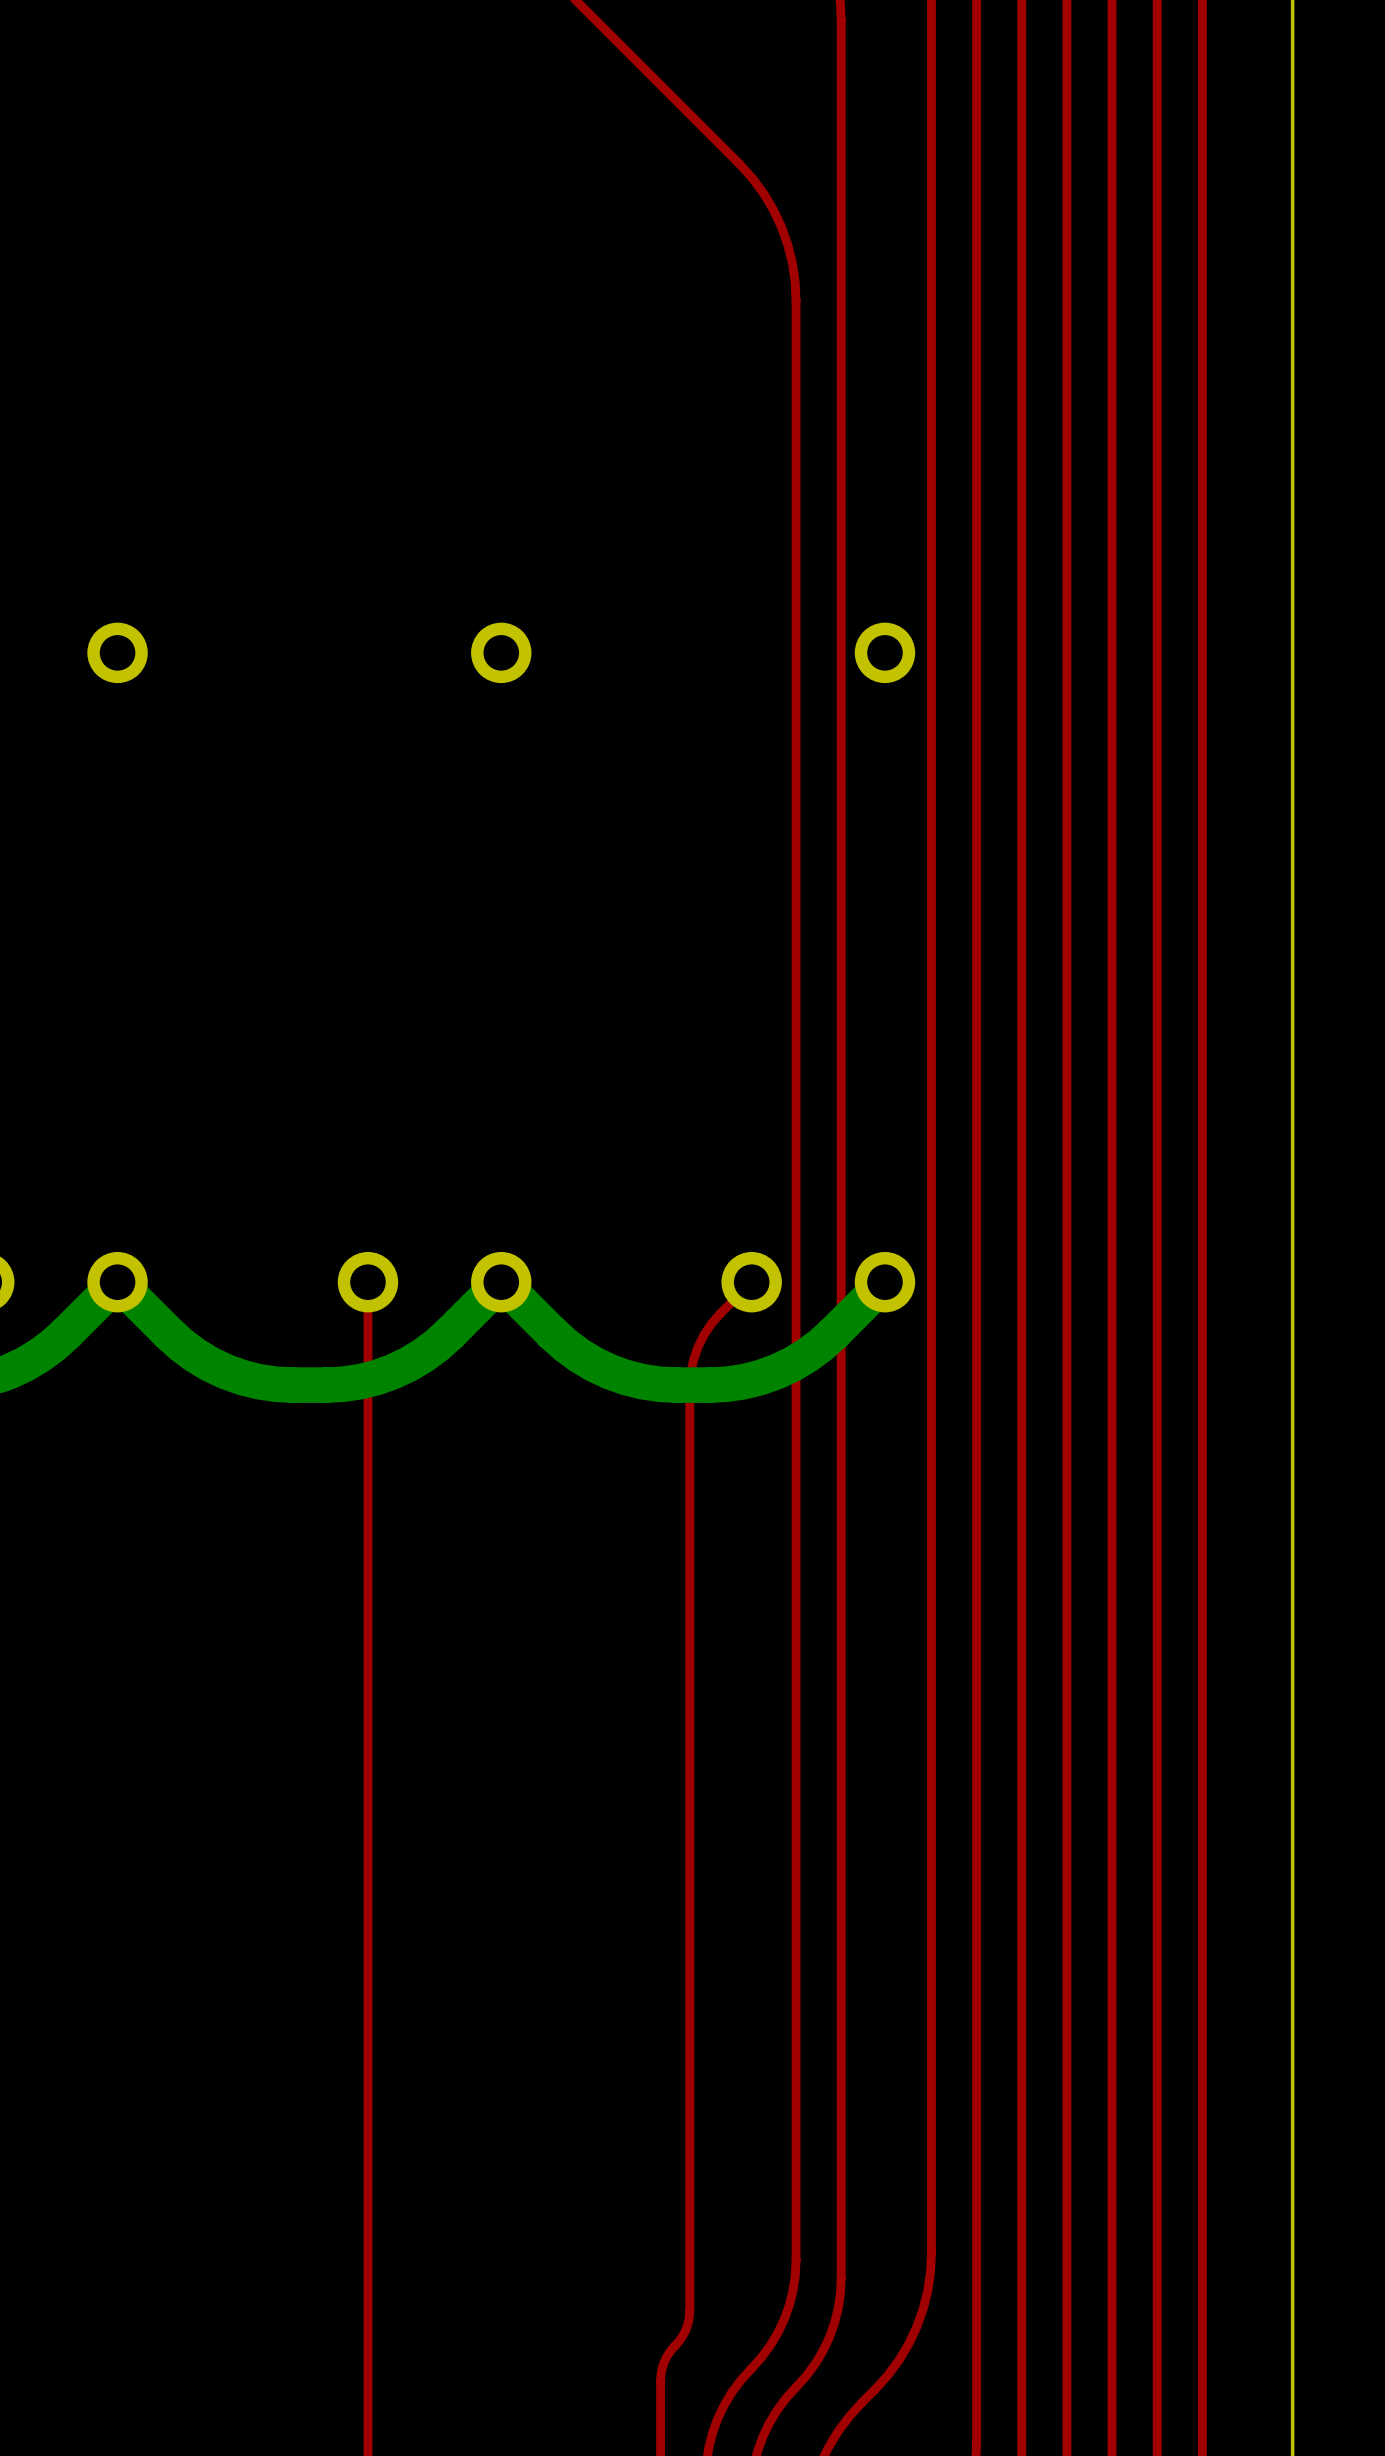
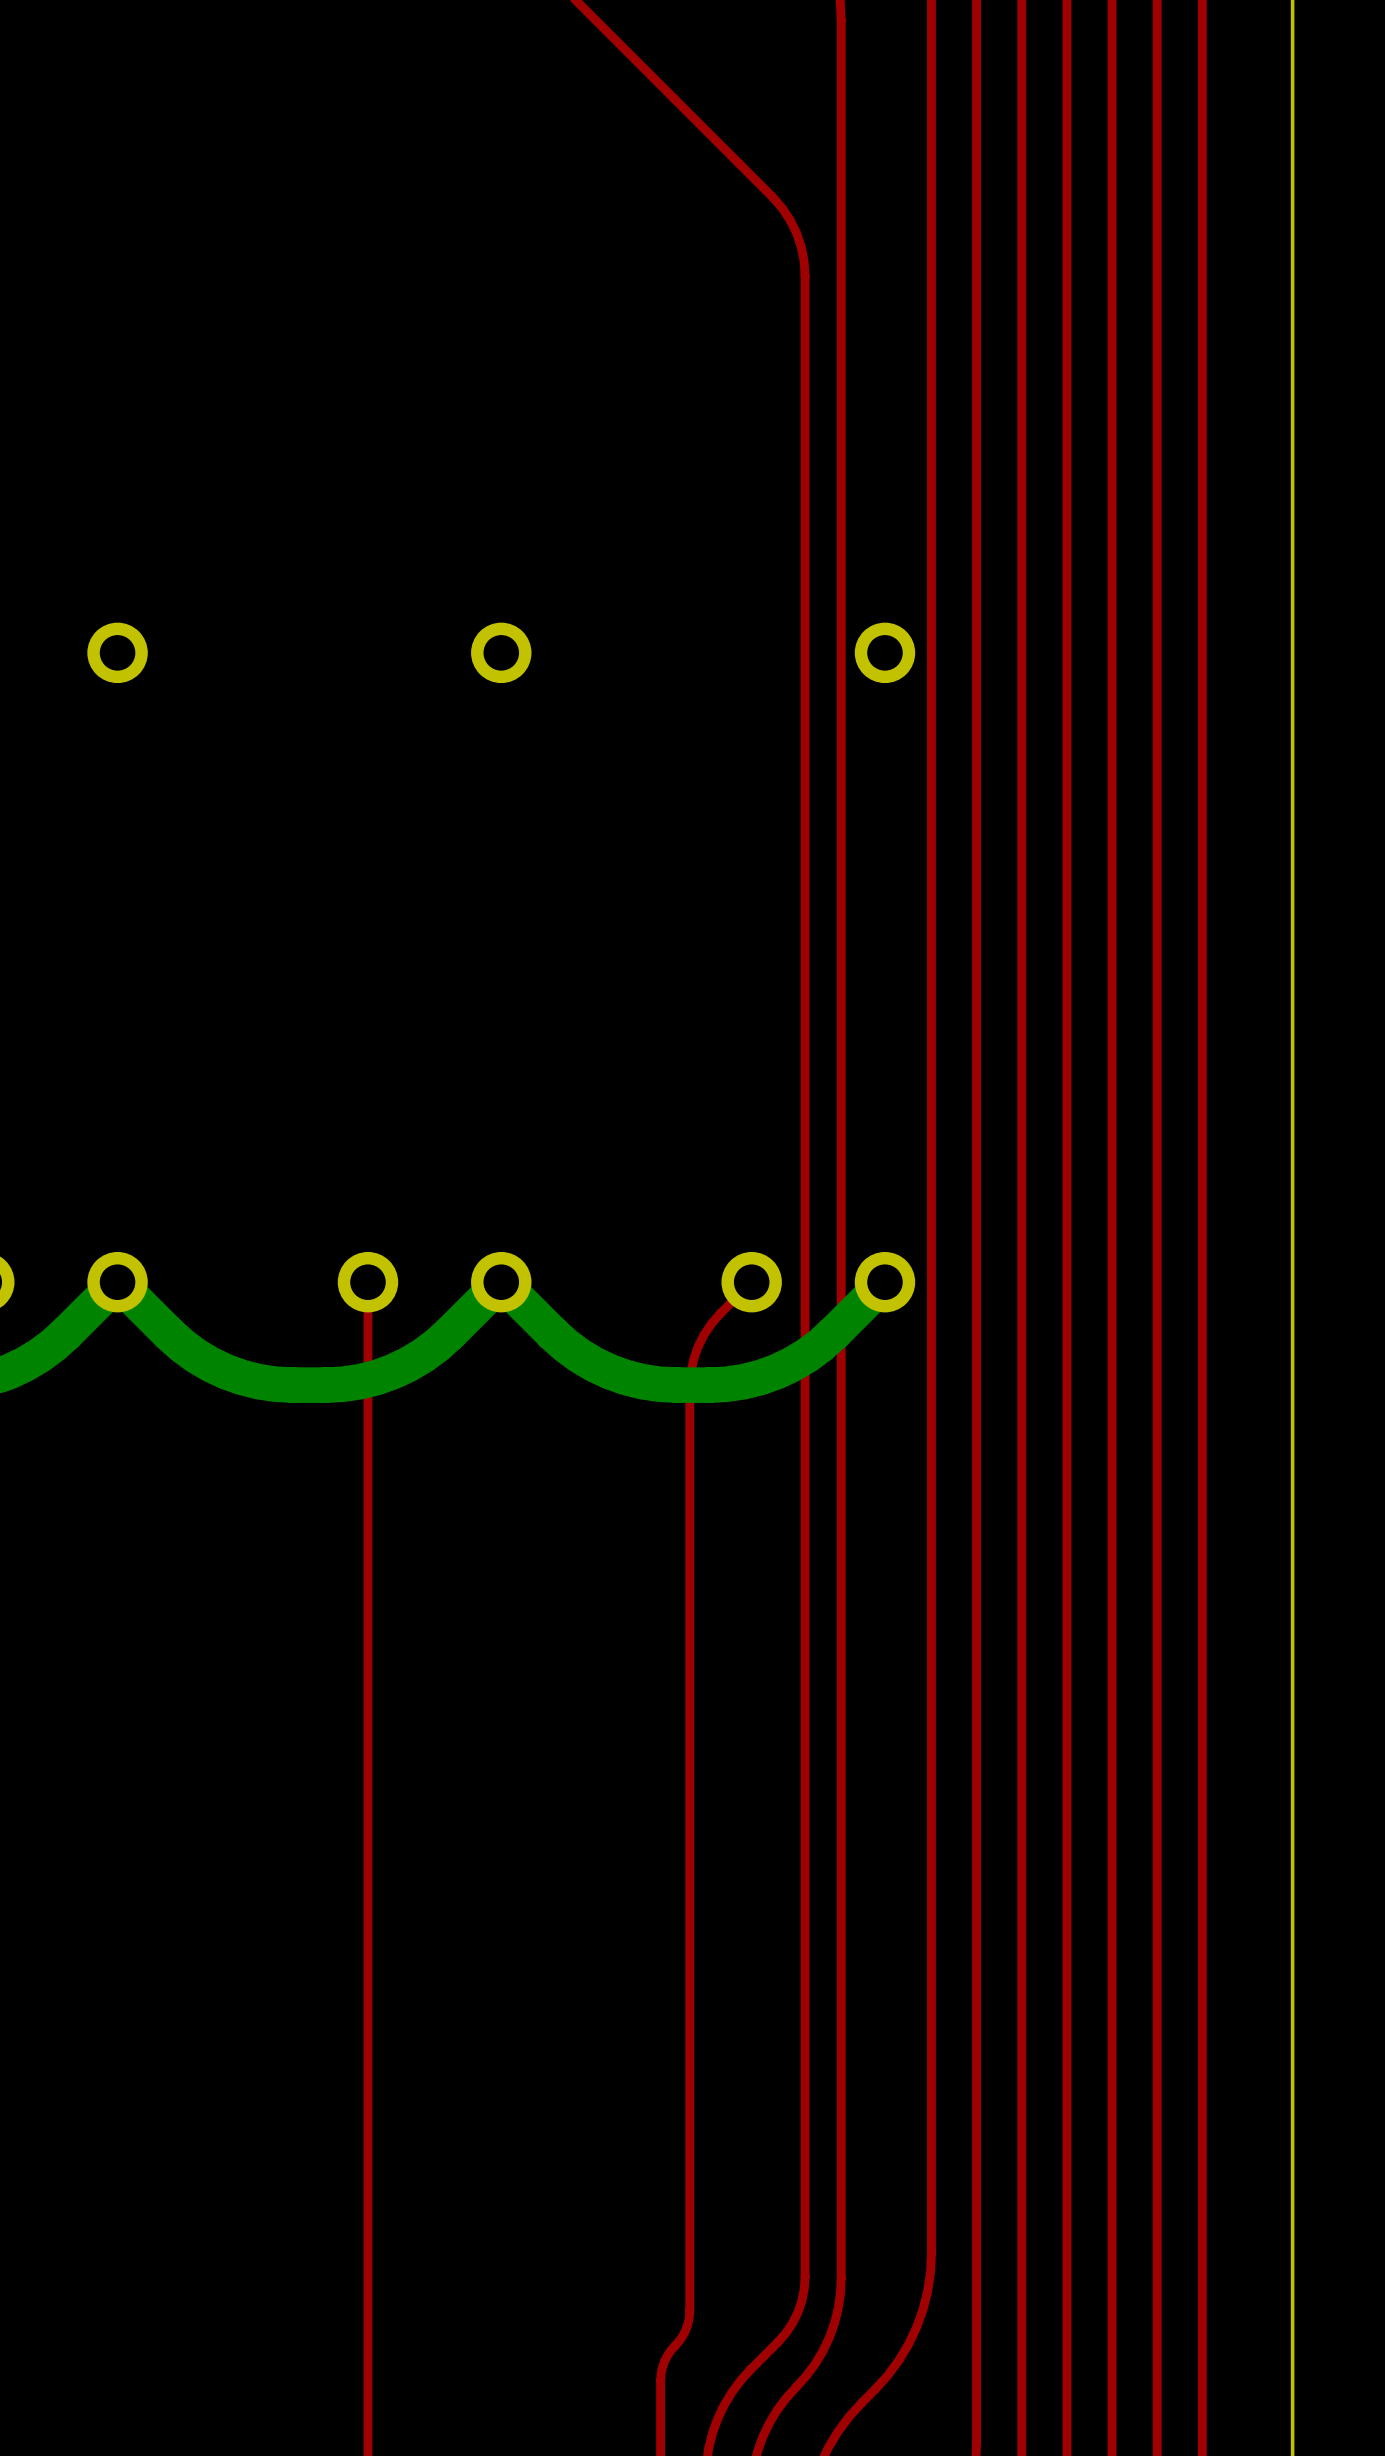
top track: (739, 163) (763, 193) (781, 226) (792, 262) (796, 300) (796, 2260) (793, 2290) (784, 2319) (770, 2345) (750, 2369) -> (739, 163) (772, 196) (790, 219) (801, 247) (805, 276) (805, 2276) (801, 2300) (792, 2322) (777, 2342) (750, 2369)

